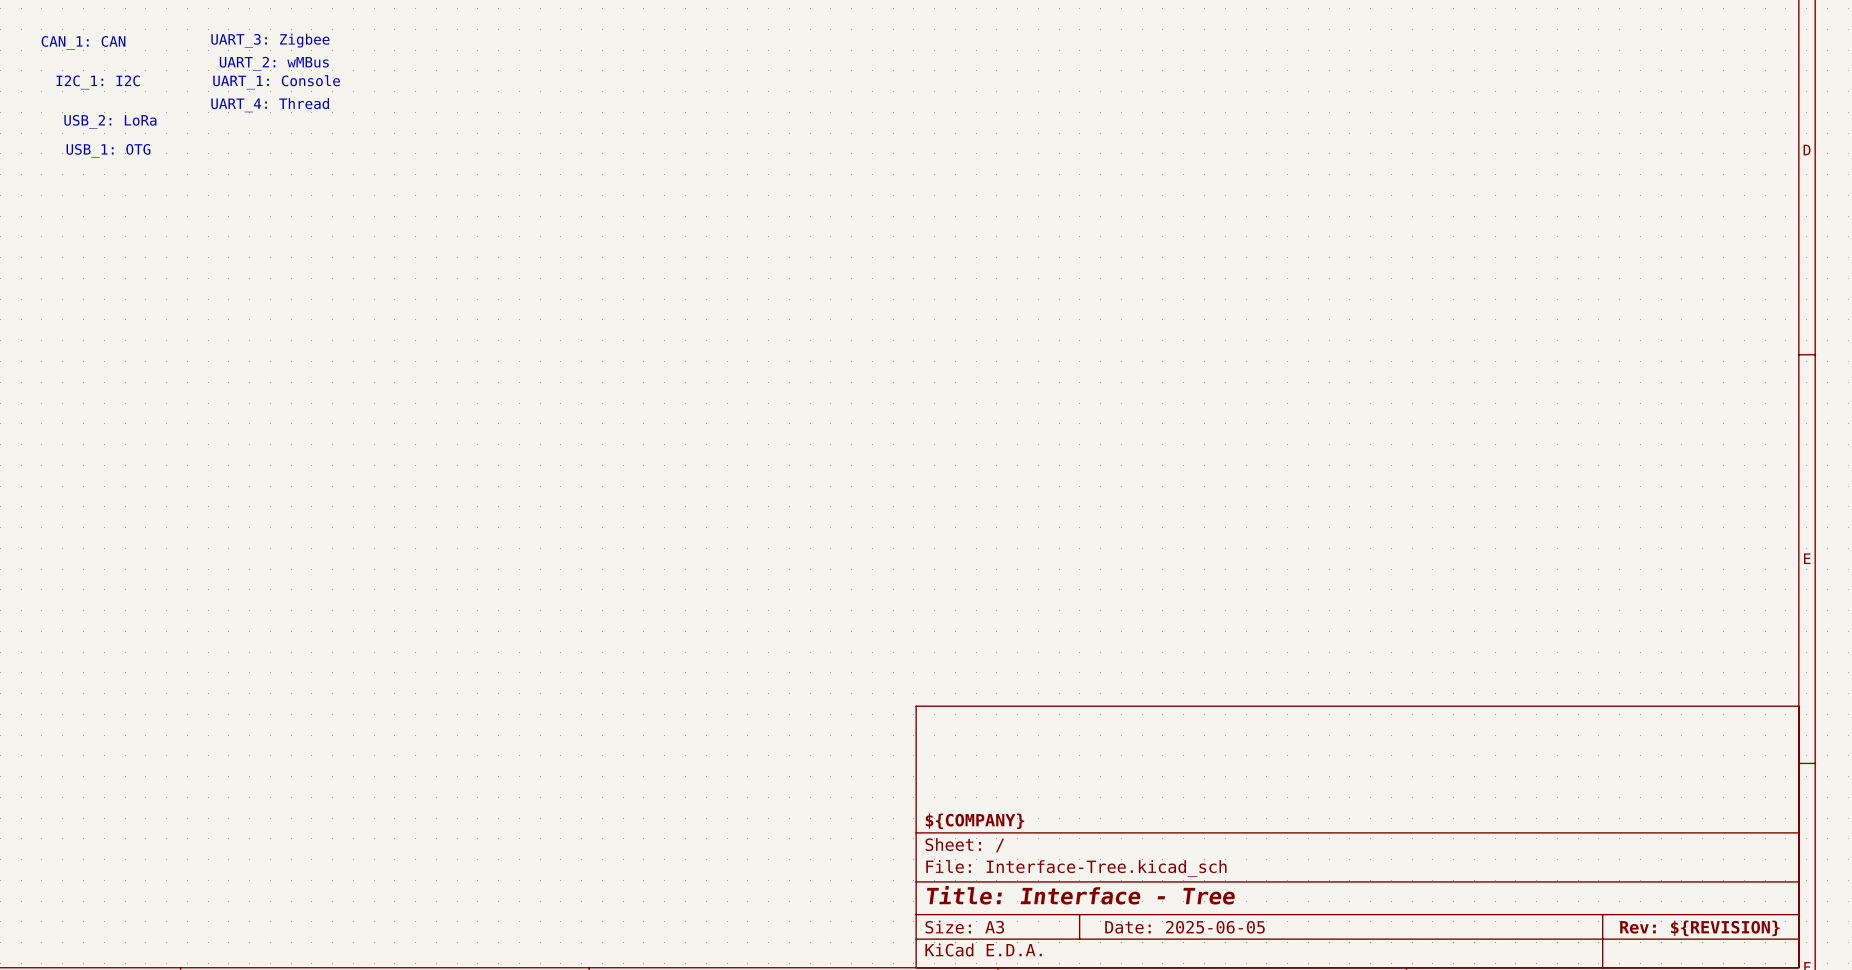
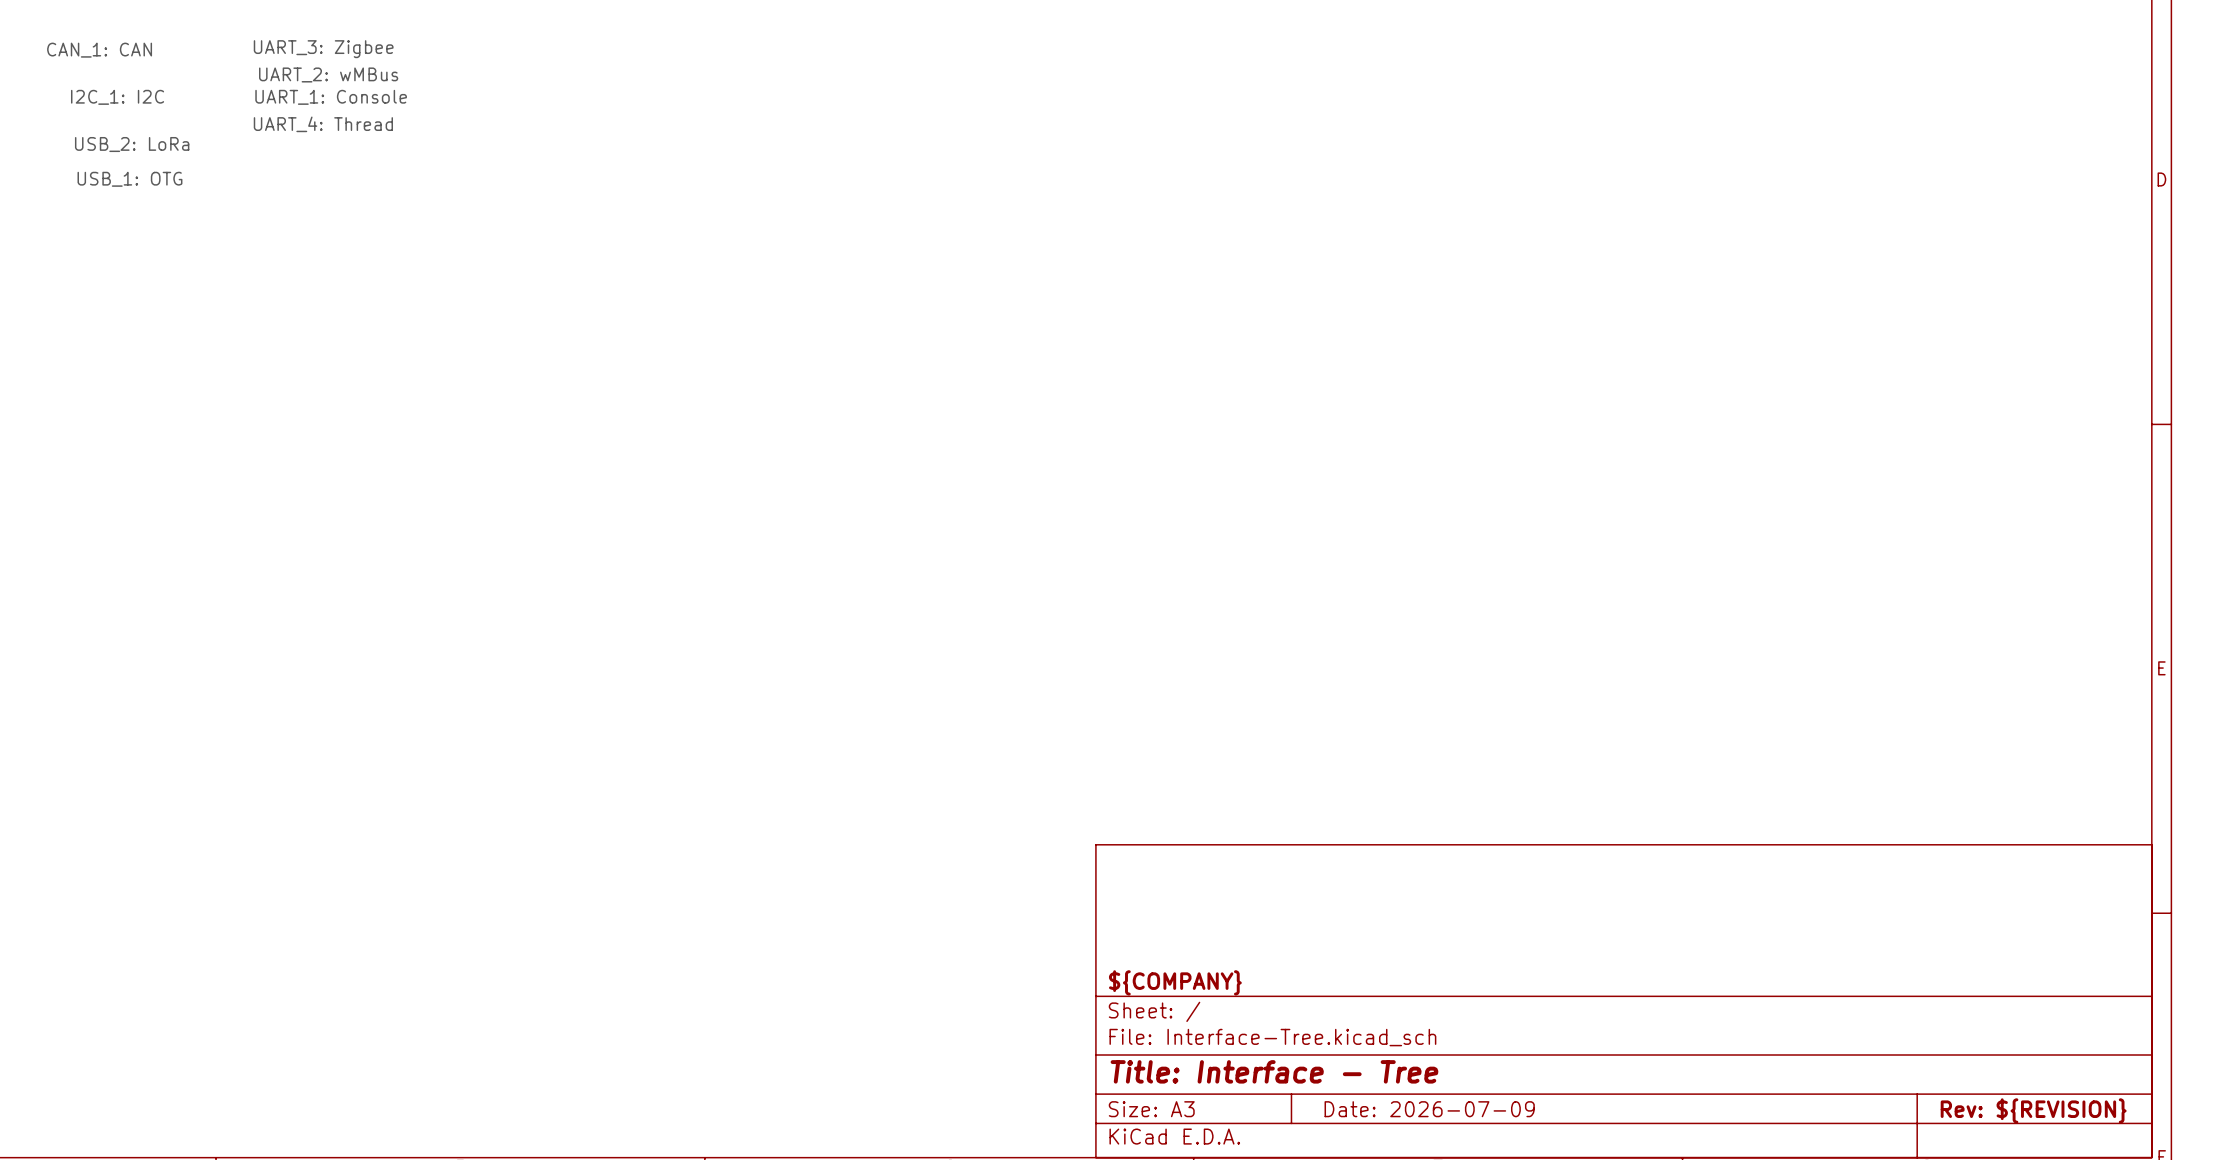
title block: Date: 2025-06-05 (1185, 927) -> Date: 2026-07-09 (1429, 1109)

